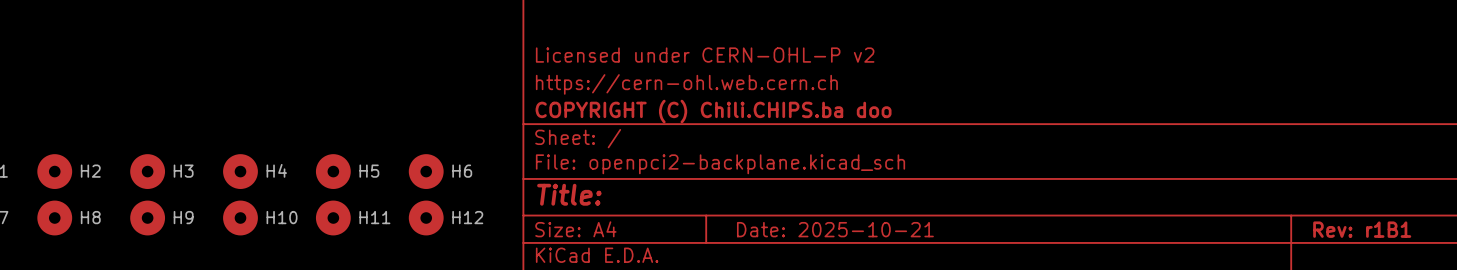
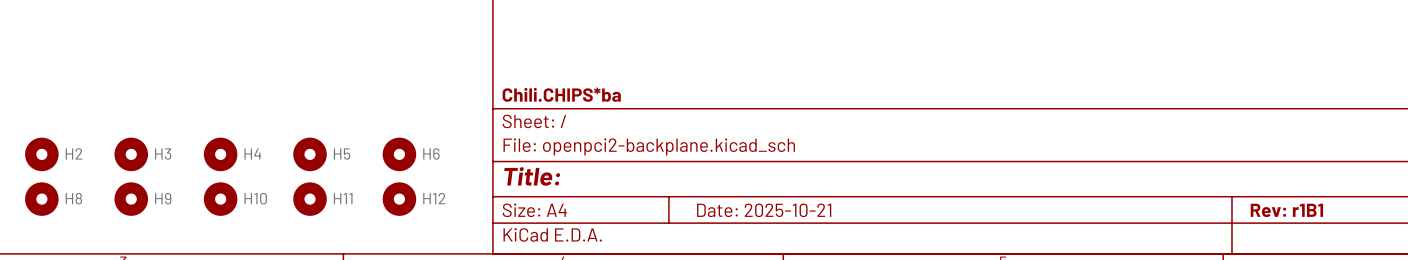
title block: Licensed under CERN-OHL-P v2 (705, 55) -> none
title block: https://cern-ohl.web.cern.ch (686, 84) -> none
title block: COPYRIGHT (C) Chili.CHIPS.ba doo (713, 111) -> Chili.CHIPS*ba (561, 94)

